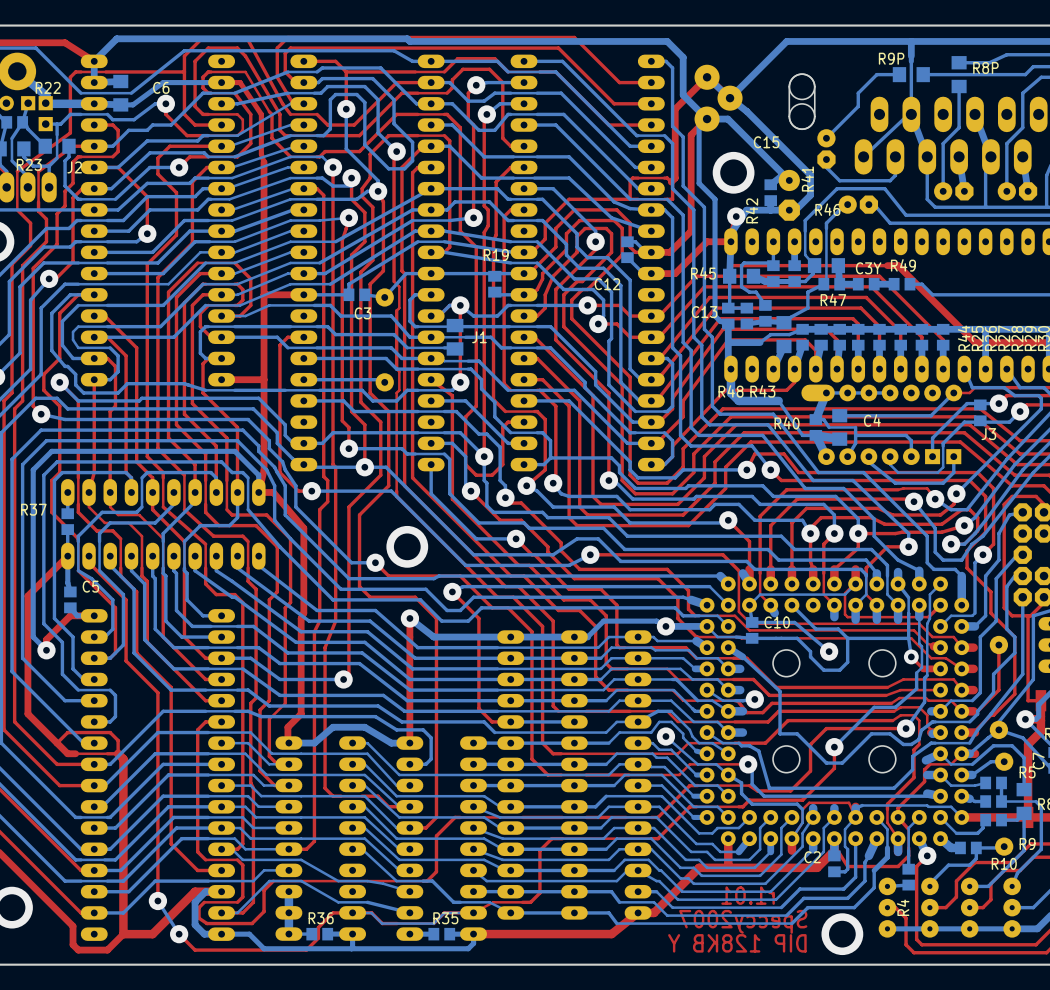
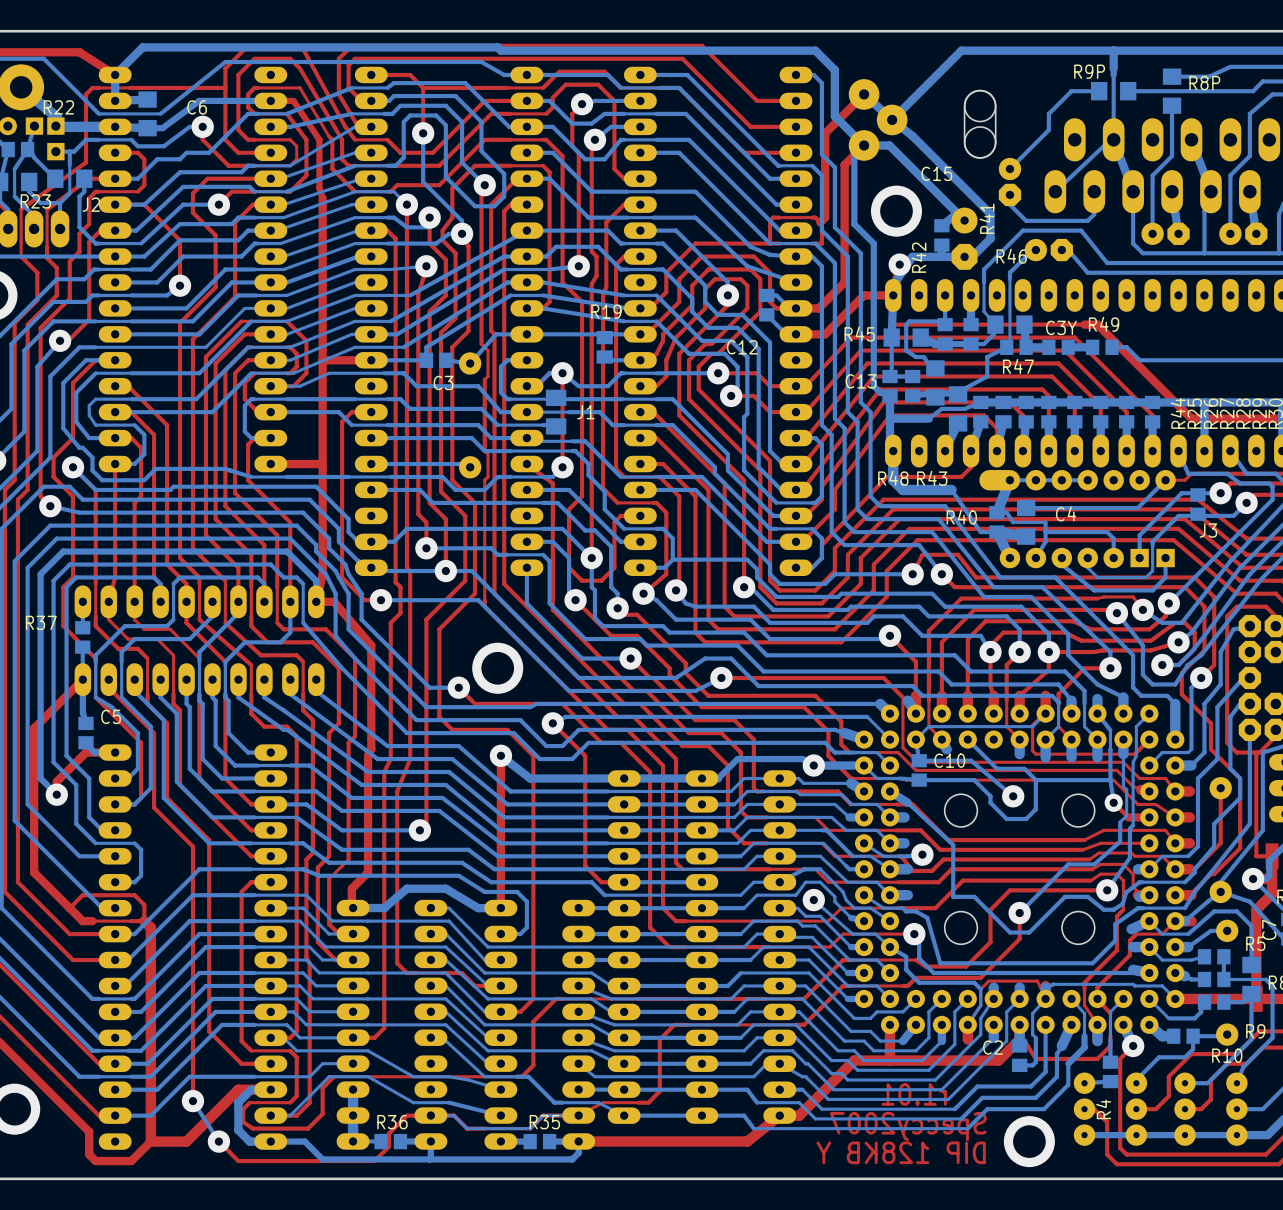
R43 footprint: [759, 300, 772, 327] -> [926, 360, 945, 406]

